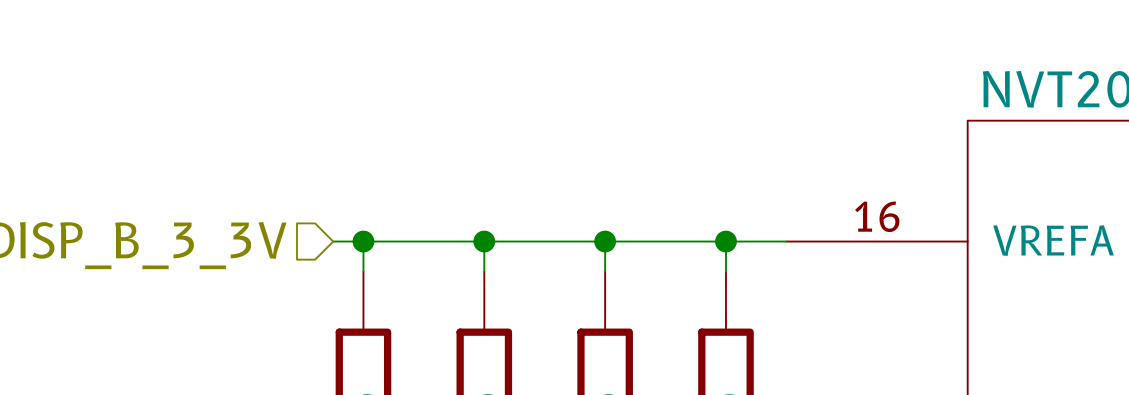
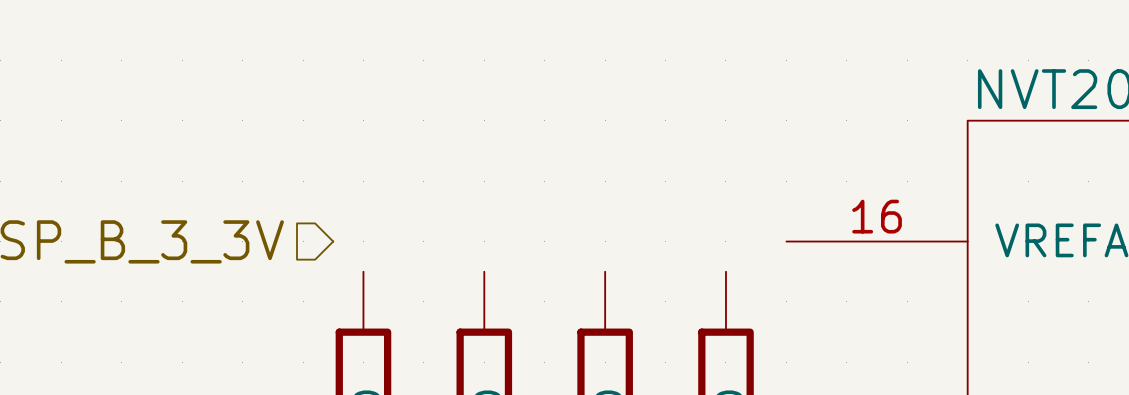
wire: (333, 241) (786, 241) -> none
wire: (363, 241) (363, 271) -> none
junction: (363, 241) -> none
wire: (484, 241) (484, 271) -> none
junction: (484, 241) -> none
wire: (605, 241) (605, 271) -> none
junction: (605, 241) -> none
wire: (725, 241) (725, 271) -> none
junction: (725, 241) -> none

